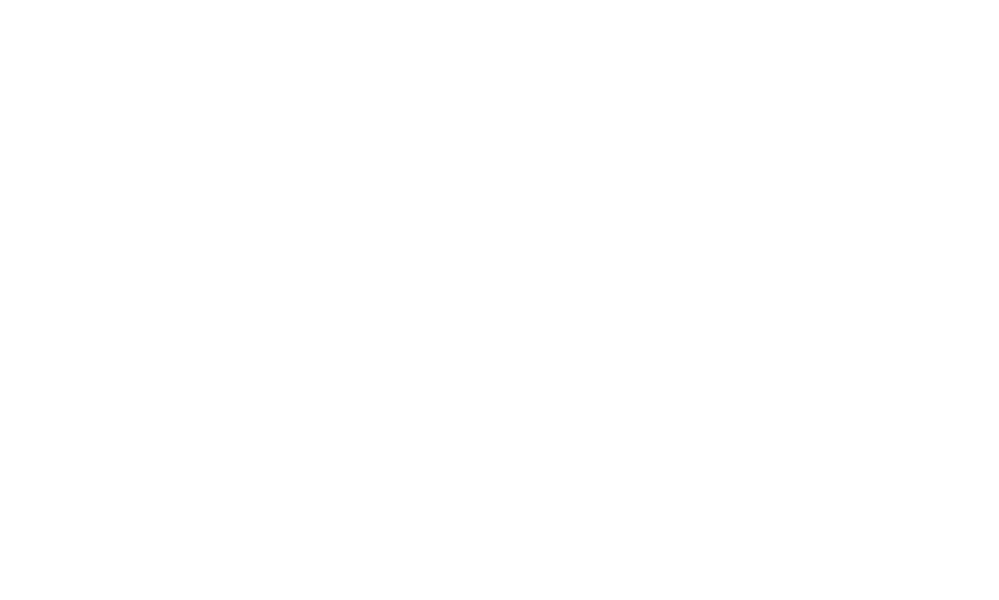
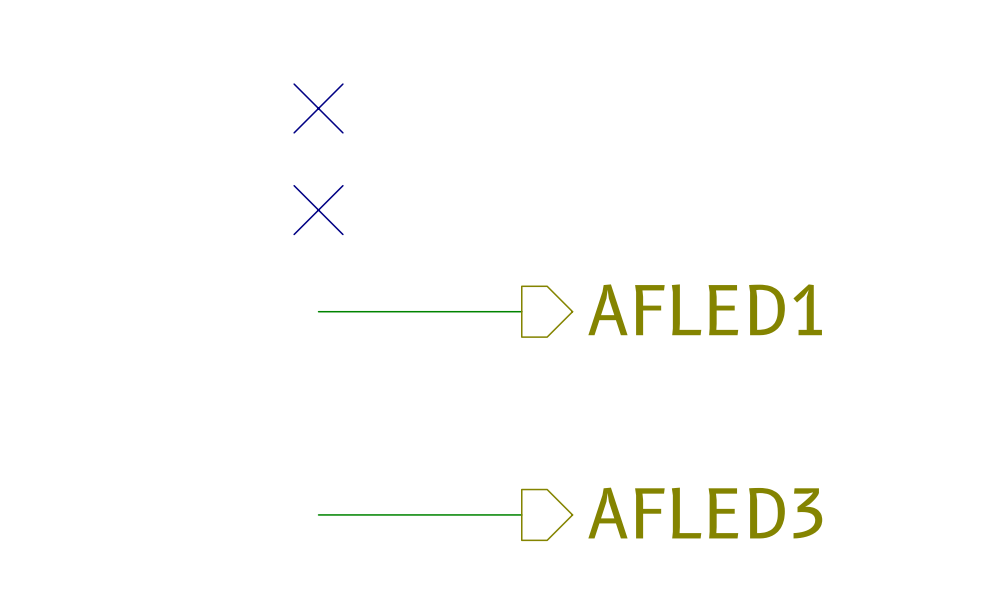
no-connect mark: none -> (318, 108)
no-connect mark: none -> (318, 210)
hierarchical label: none -> AFLED1 (705, 309)
wire: none -> (318, 311) (521, 311)
hierarchical label: none -> AFLED3 (705, 513)
wire: none -> (318, 514) (521, 514)

